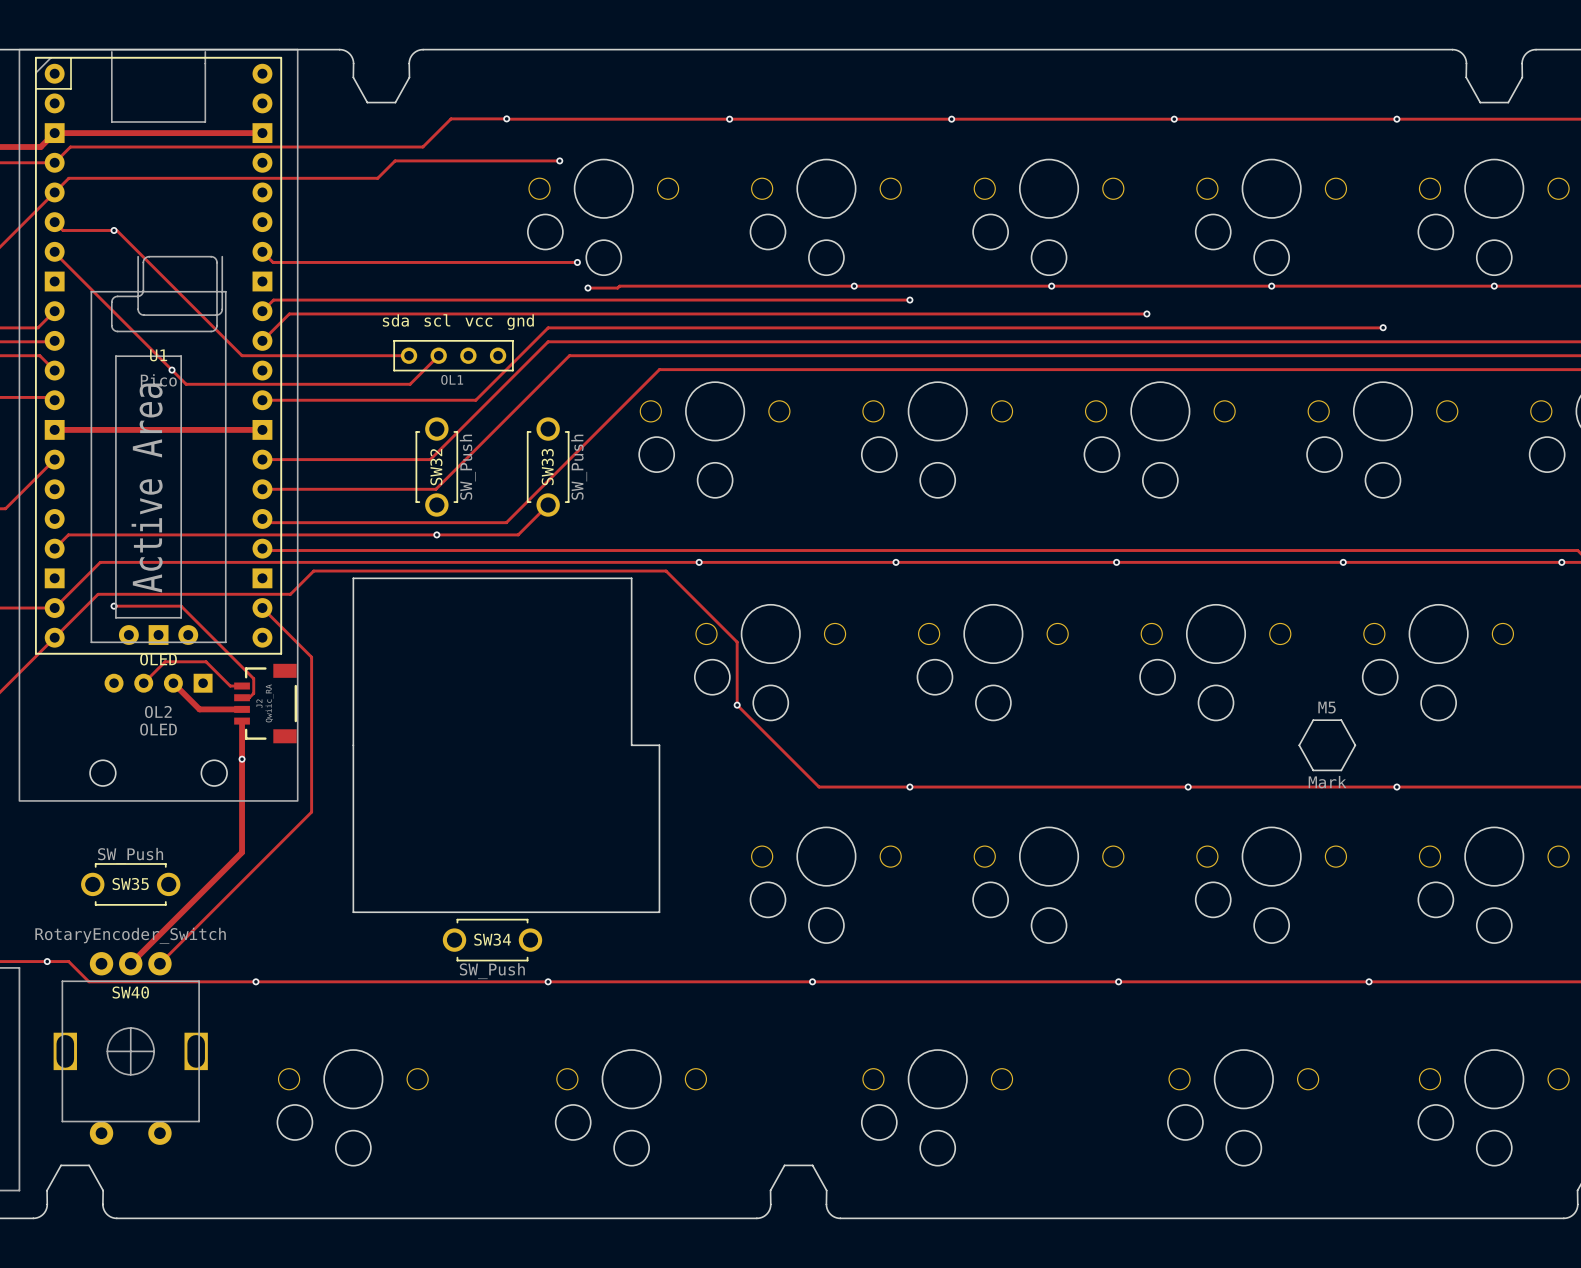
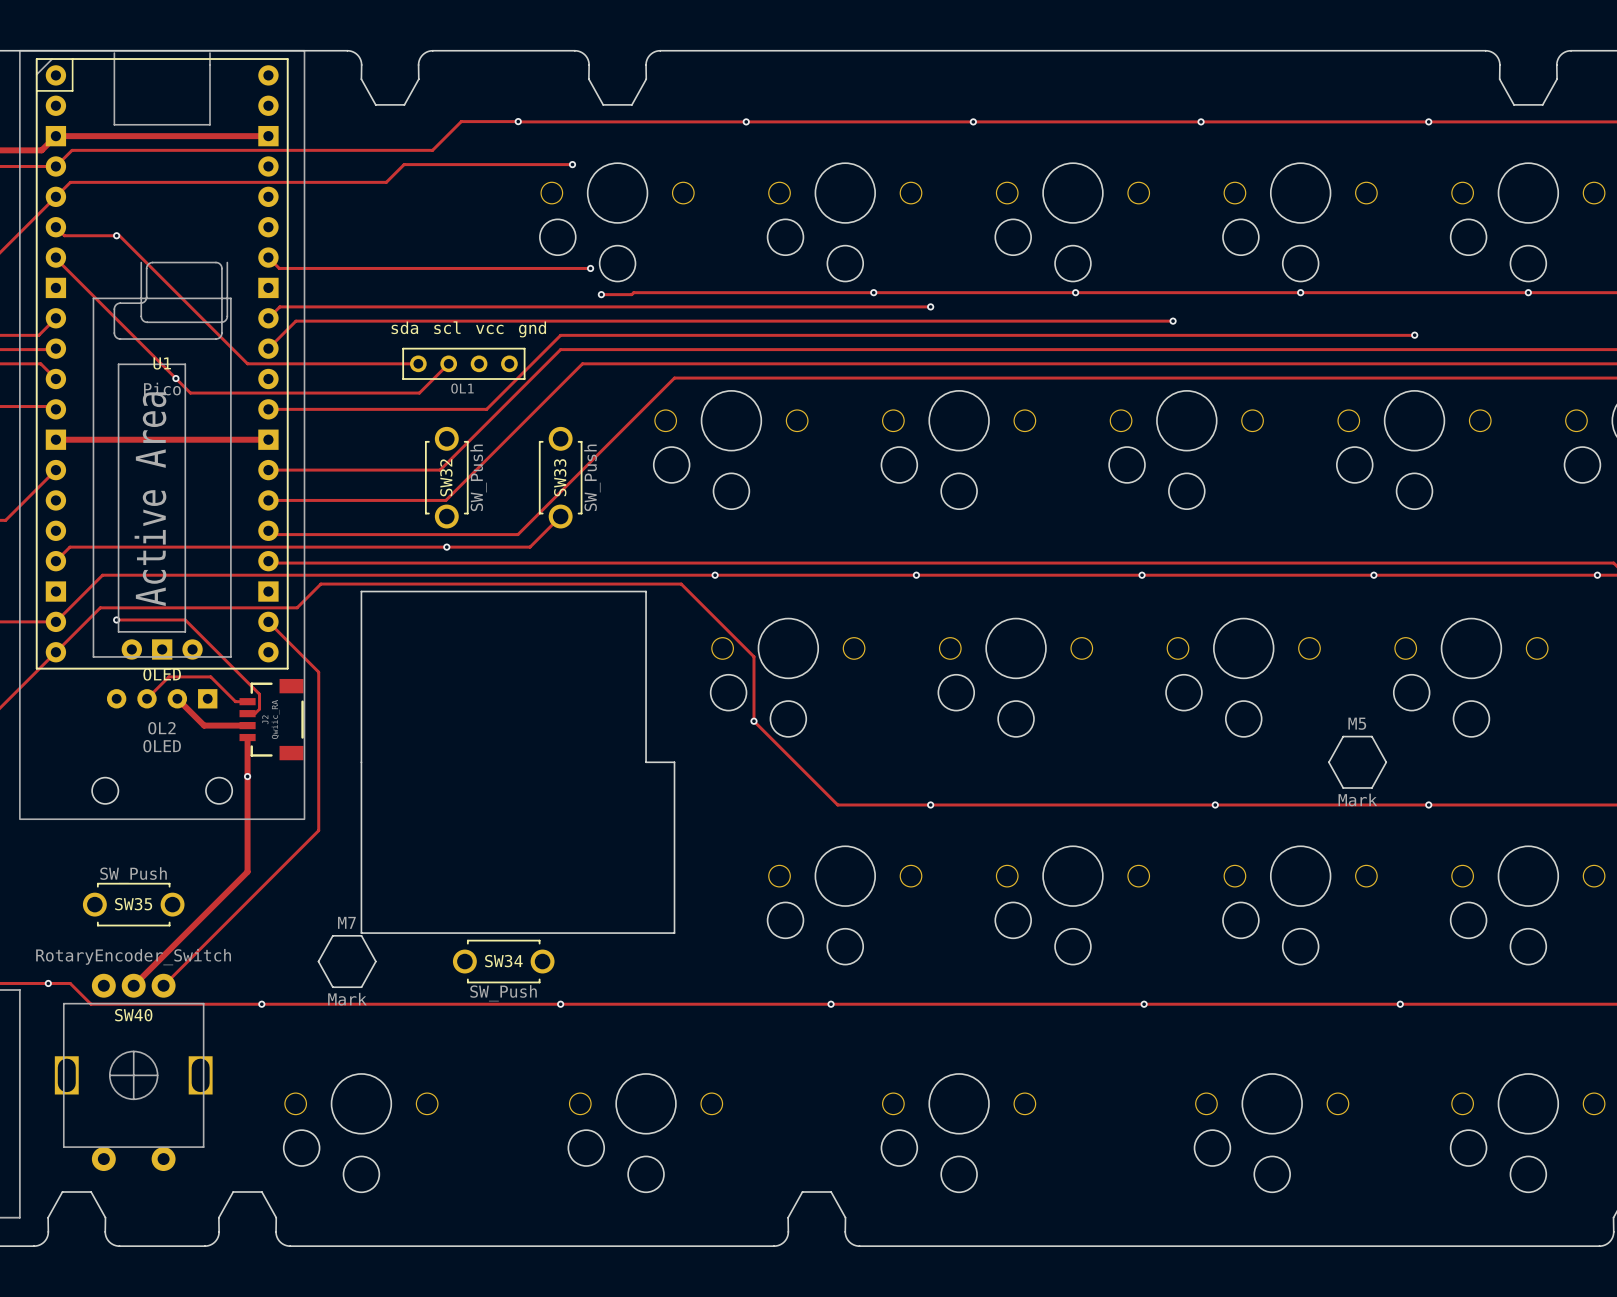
board edge: (562, 49) (645, 49) -> (574, 50) (582, 52) (587, 57) (588, 79) (603, 104) (631, 104) (646, 79) (647, 58) (652, 52) (660, 50)
M7: none -> Mark (347, 961)
board edge: (200, 1218) (283, 1218) -> (204, 1246) (211, 1244) (217, 1239) (218, 1217) (233, 1191) (261, 1191) (276, 1217) (277, 1238) (282, 1243) (290, 1246)

